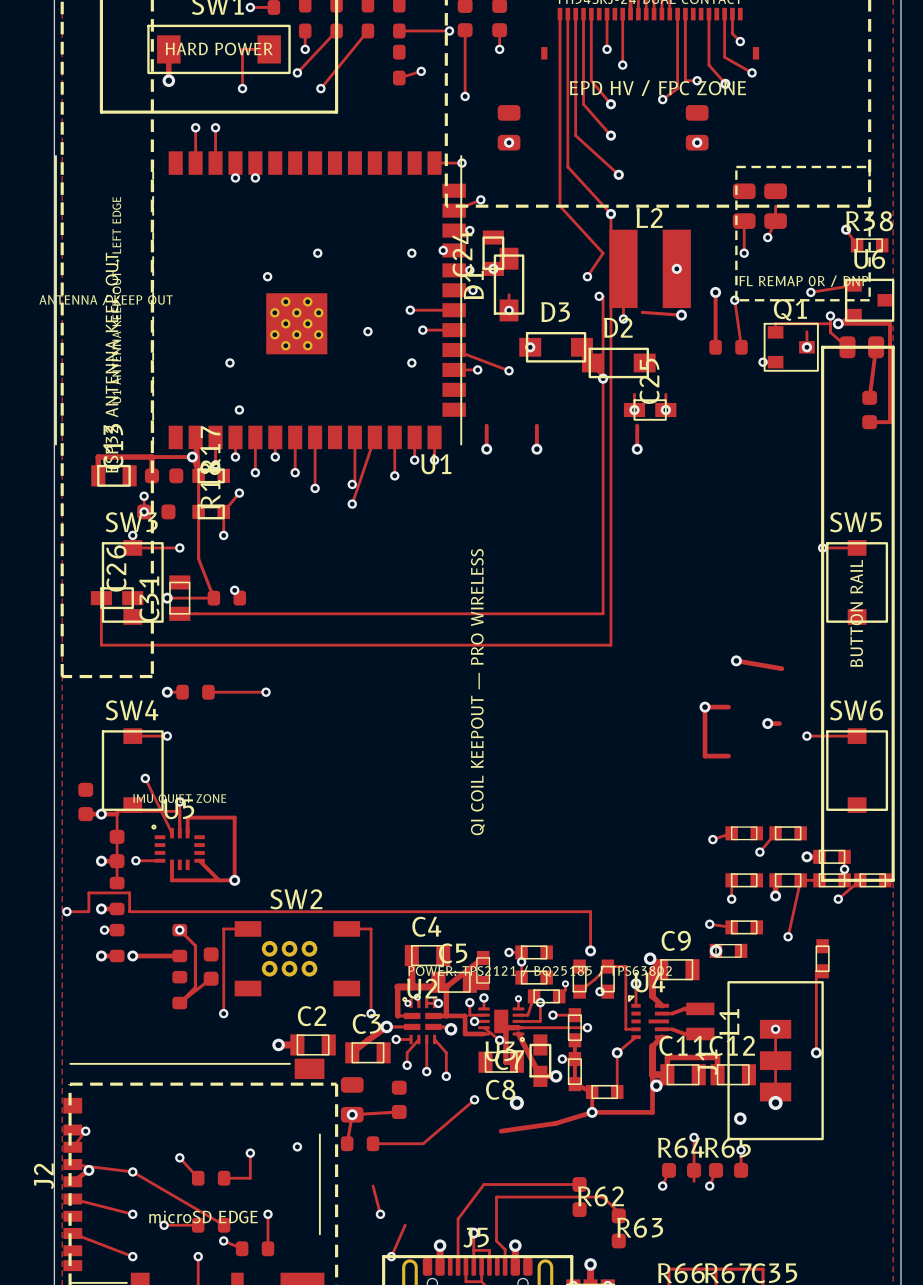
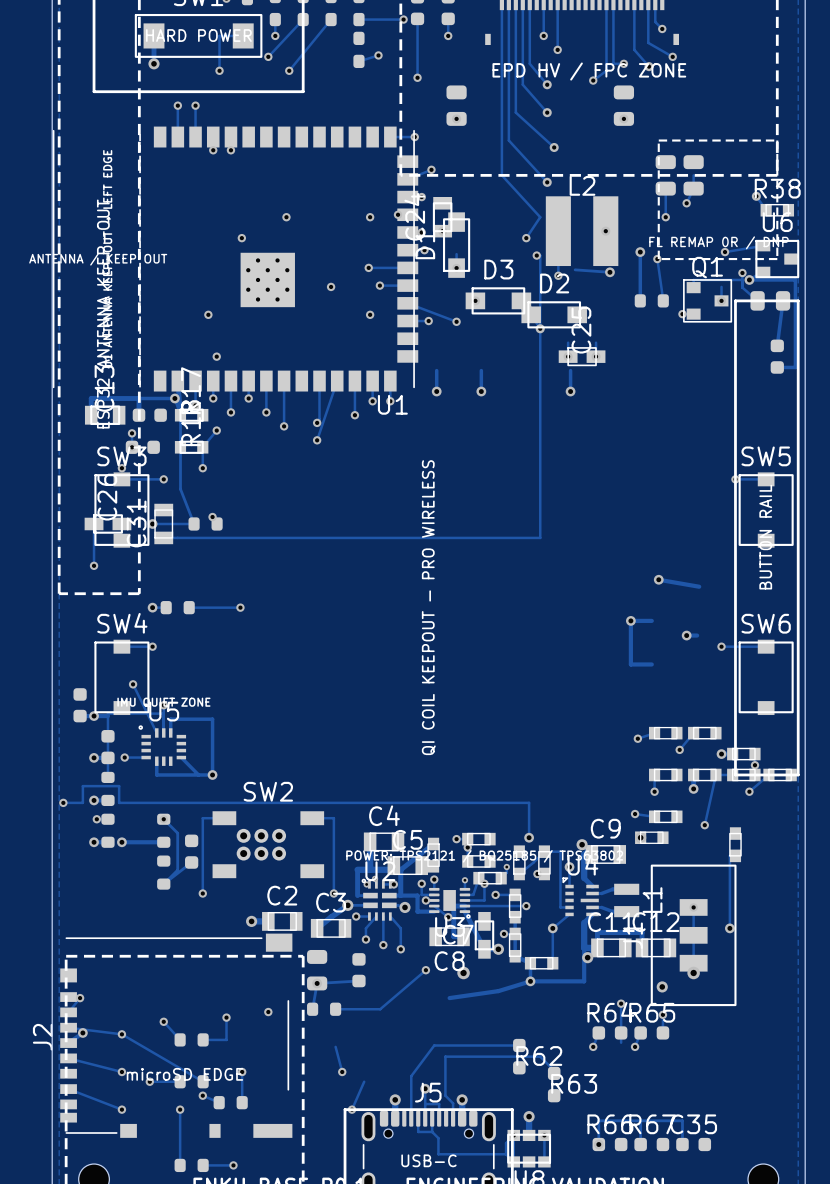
track: (610, 214) (610, 645) (101, 645) -> none
via: none -> (94, 565)

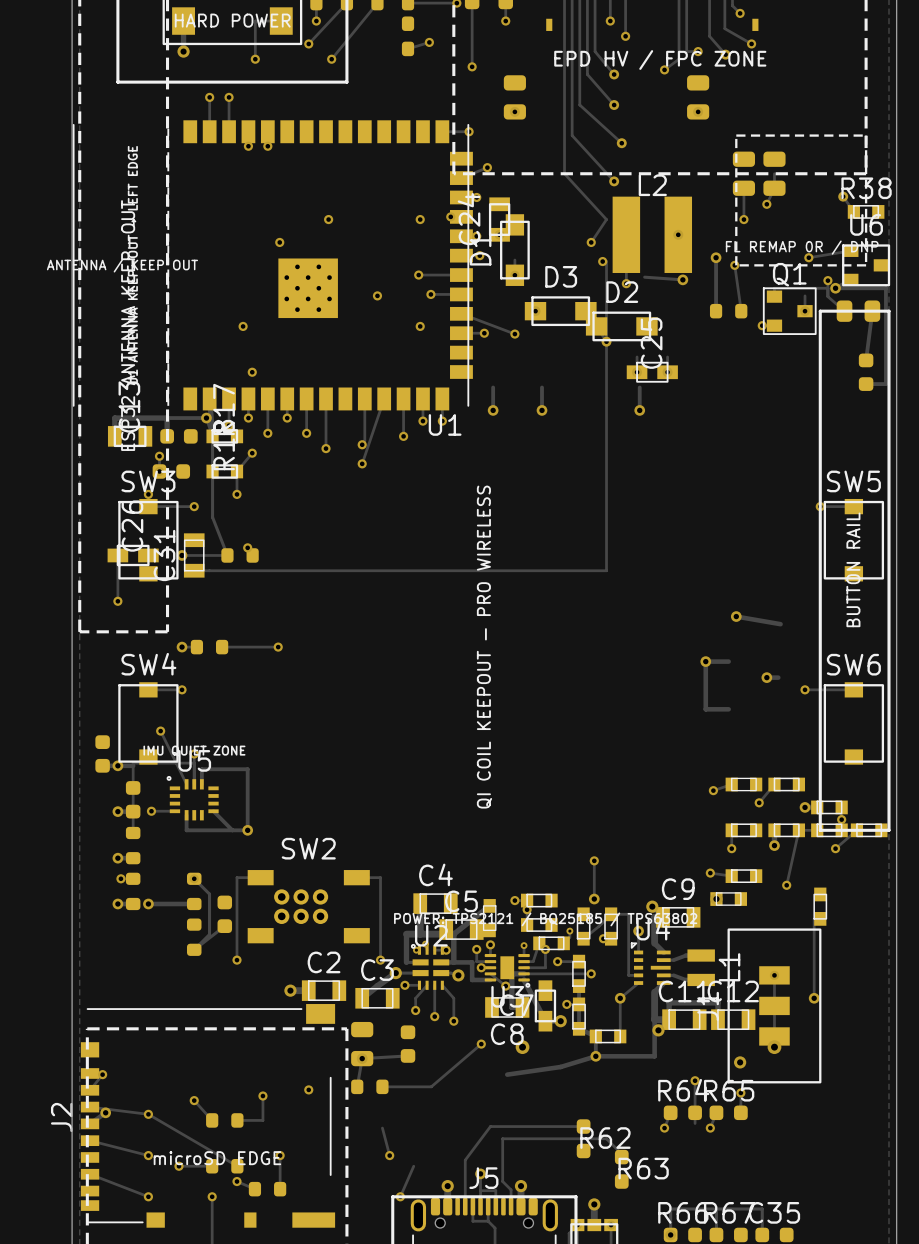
track: (63, 802) (82, 802) (82, 786) (119, 786) (119, 802) (529, 802) -> none
via: (63, 802) -> none
via: none -> (594, 860)

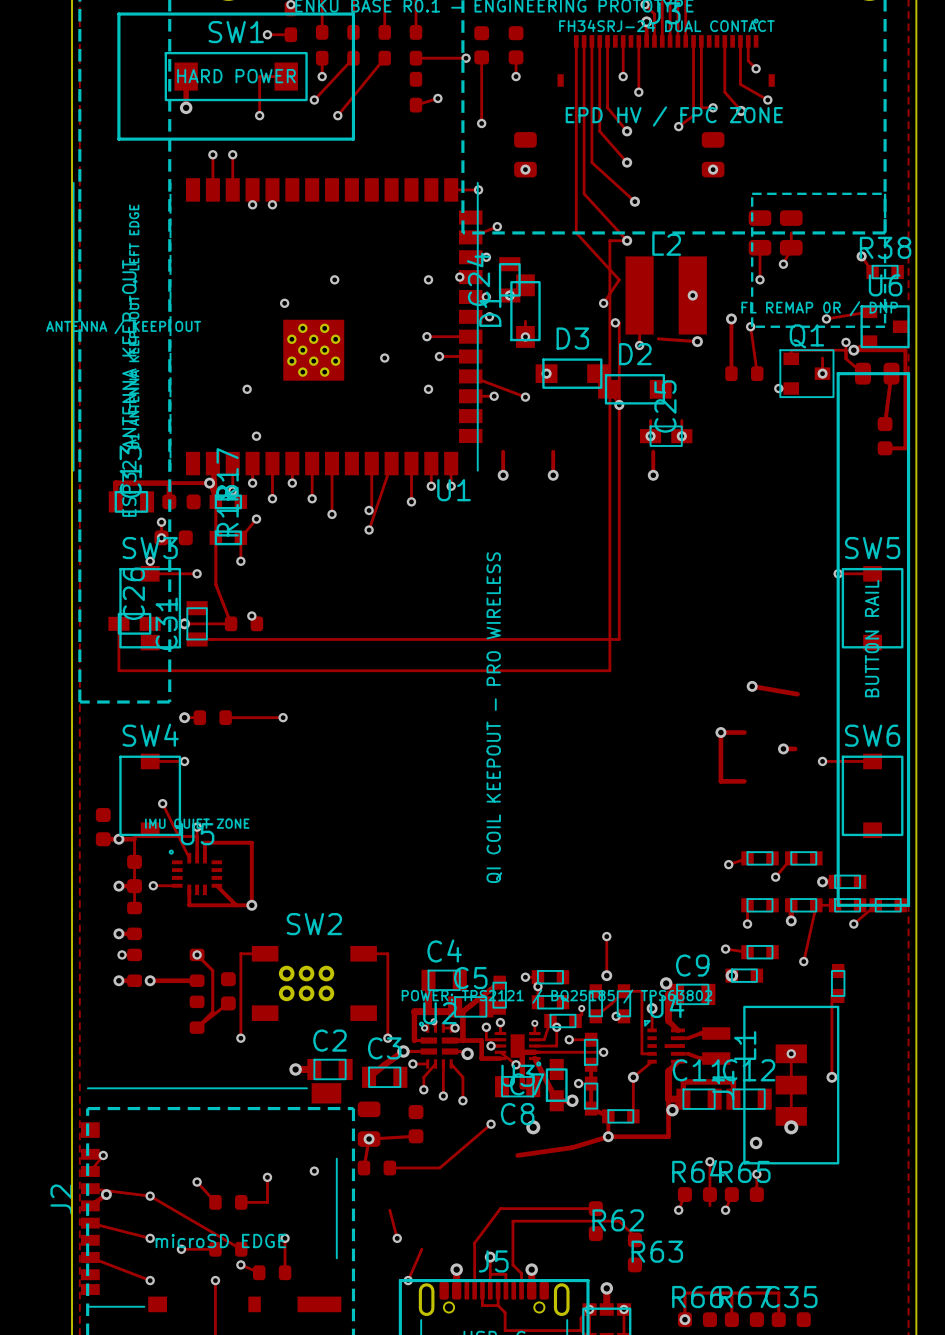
track: none -> (627, 240) (609, 240) (609, 670) (118, 670)
via: (117, 601) -> none
via: (841, 819) -> none

